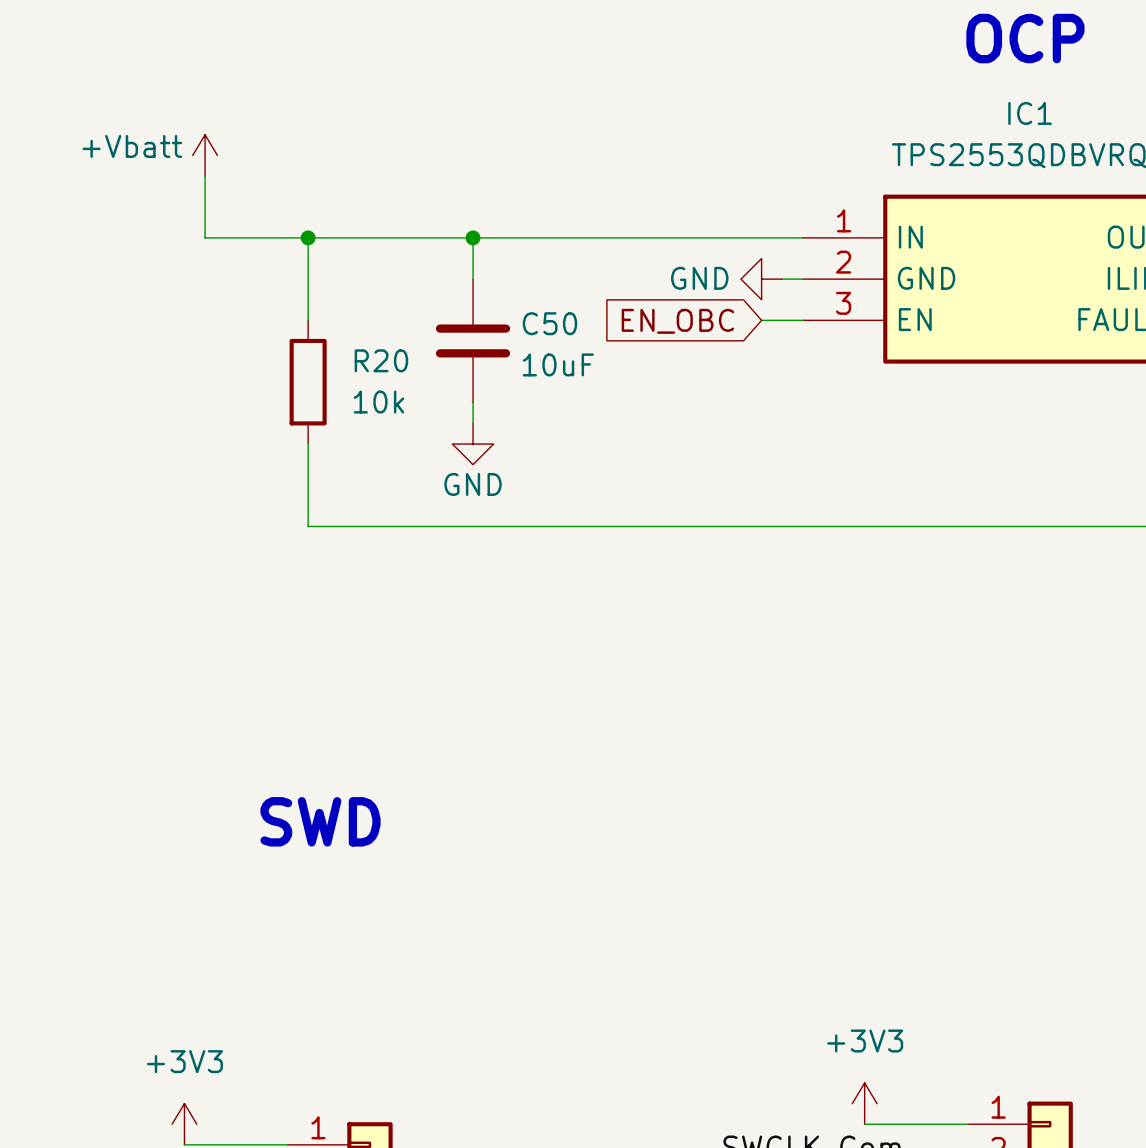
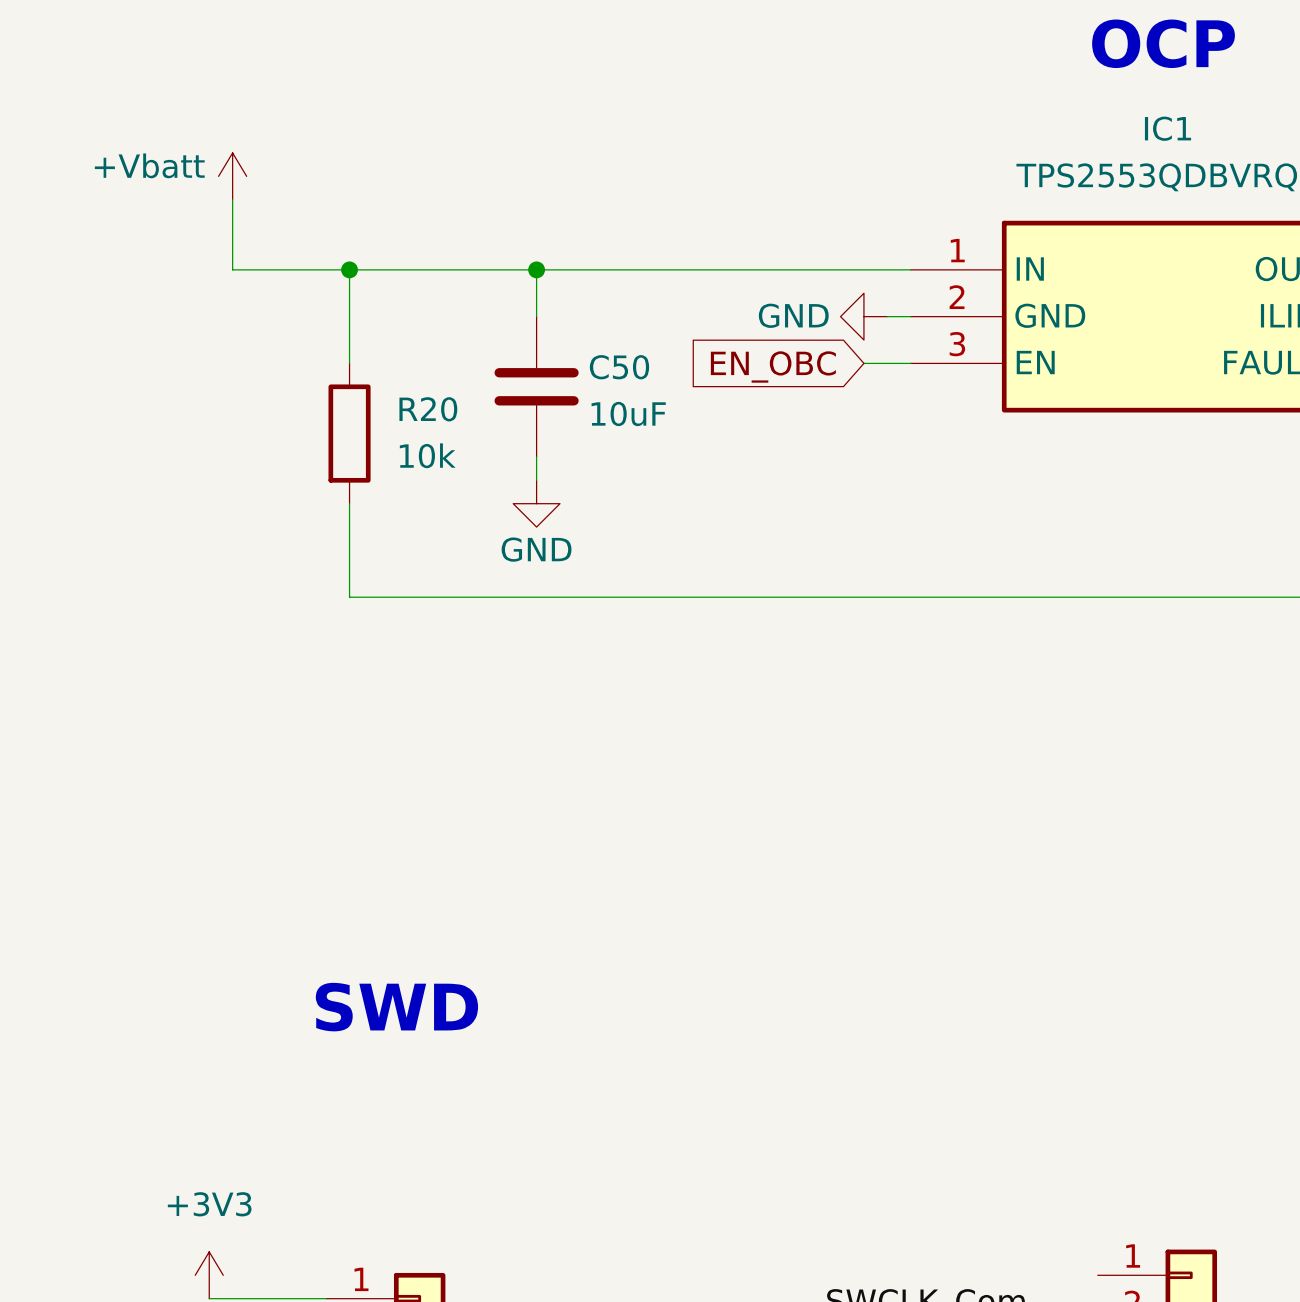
text position: SWD (320, 821) -> SWD (396, 1007)
power symbol: +3V3 (864, 1103) -> none
wire: (864, 1124) (967, 1124) -> none

